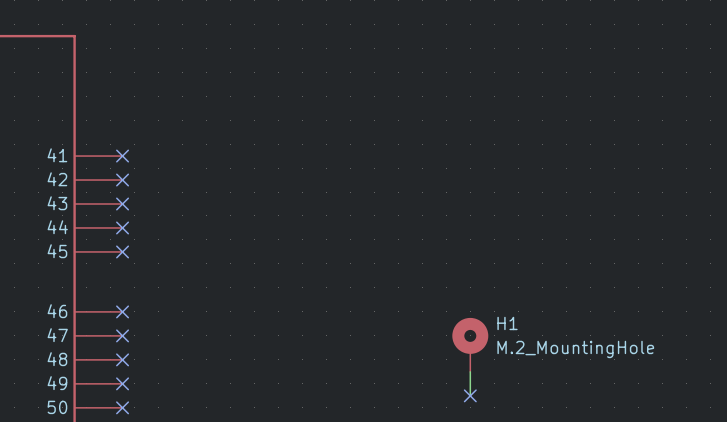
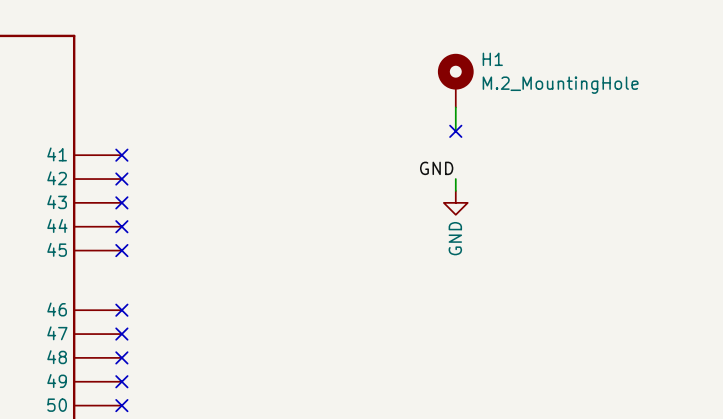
wire: none -> (455, 107) (455, 131)
no-connect mark: none -> (455, 131)
label: none -> GND (436, 168)
wire: none -> (455, 179) (455, 190)
power symbol: none -> GND (455, 202)
H1 position: (470, 344) -> (455, 80)
wire: (470, 371) (470, 395) -> none
no-connect mark: (470, 395) -> none

